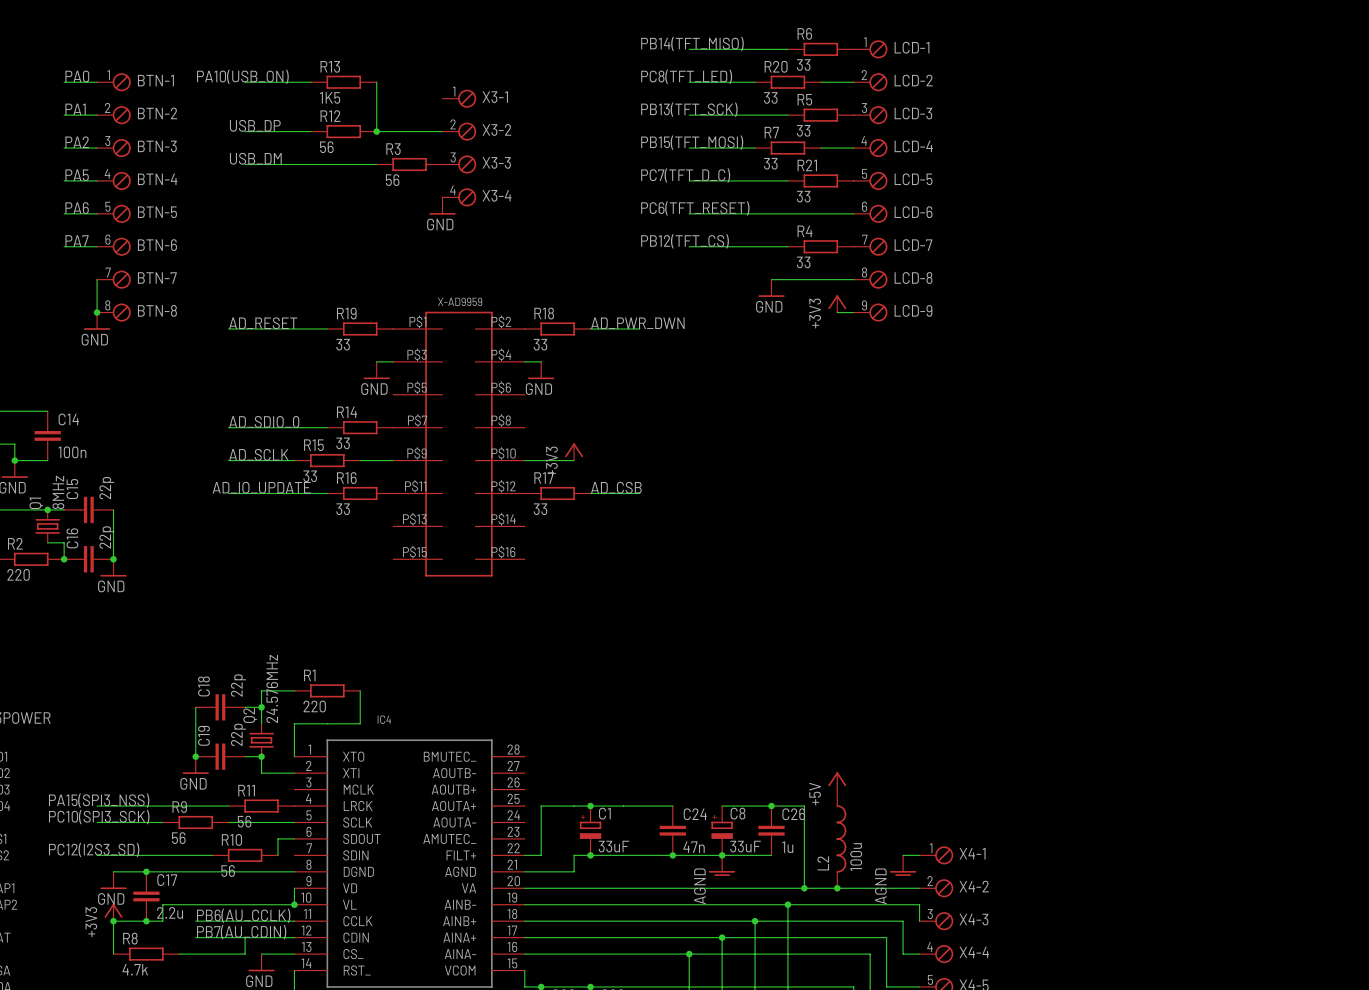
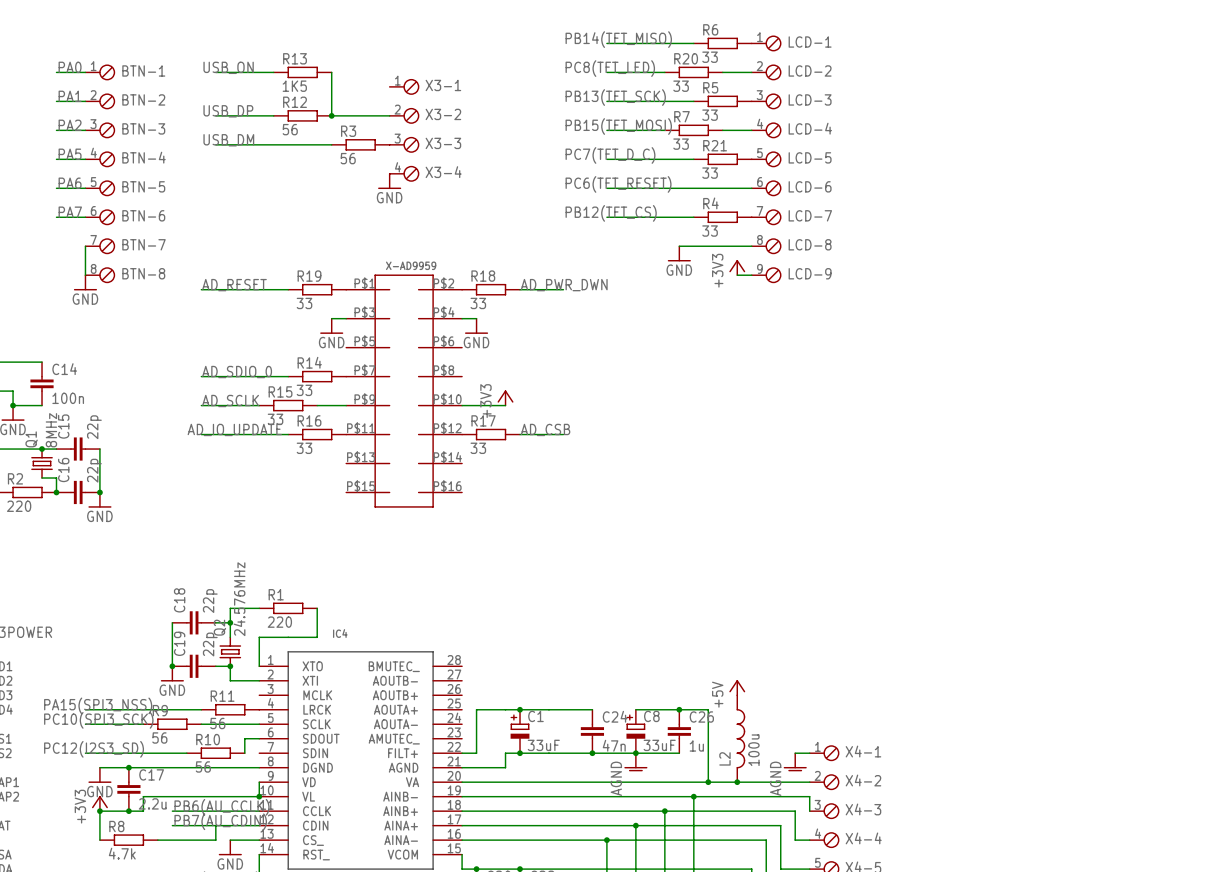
label: PA10(USB_ON) (242, 76) -> USB_ON (228, 67)
junction: (97, 312) -> none

